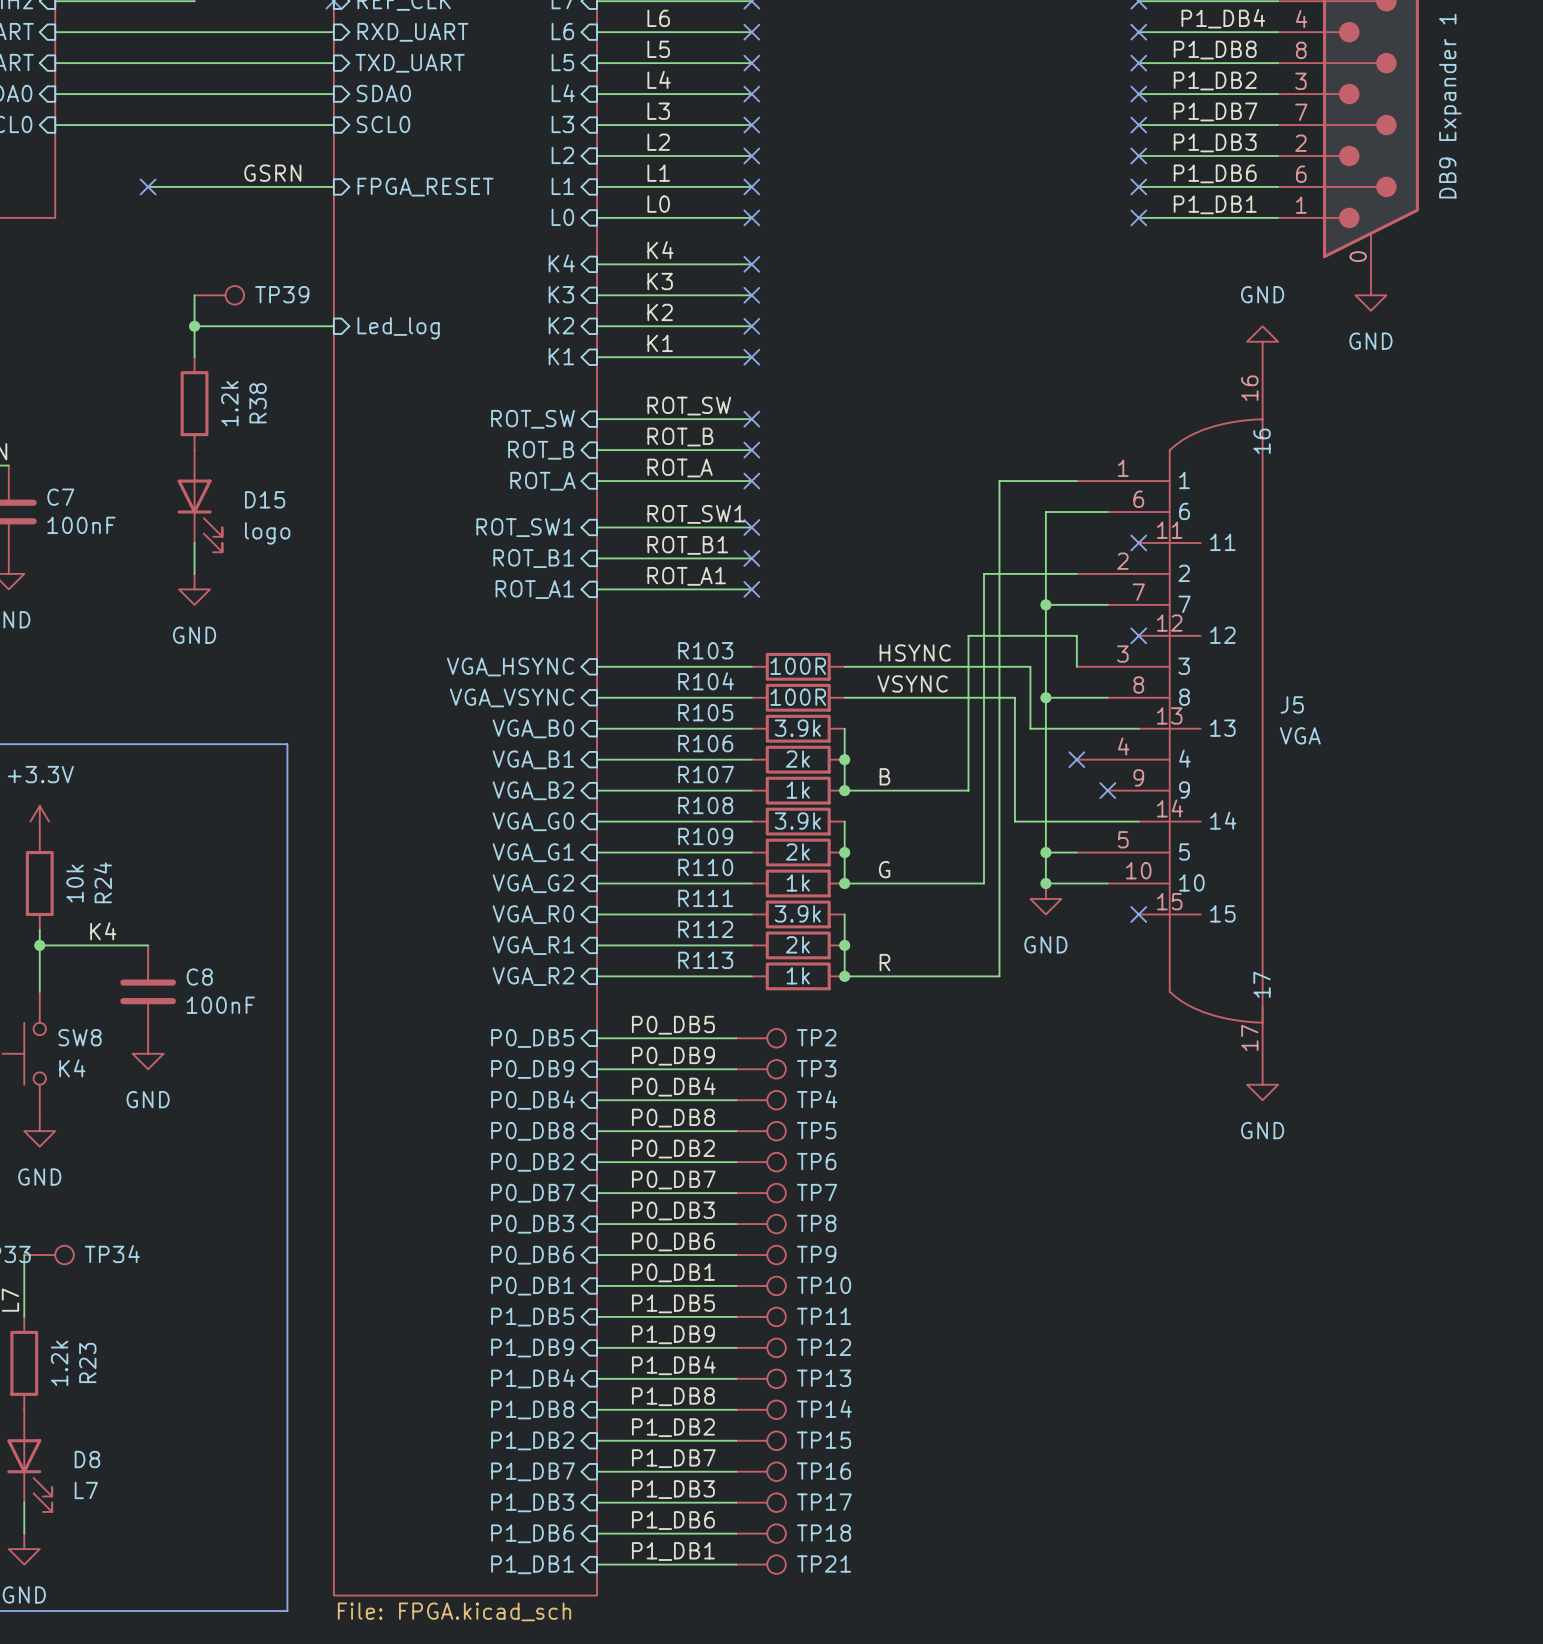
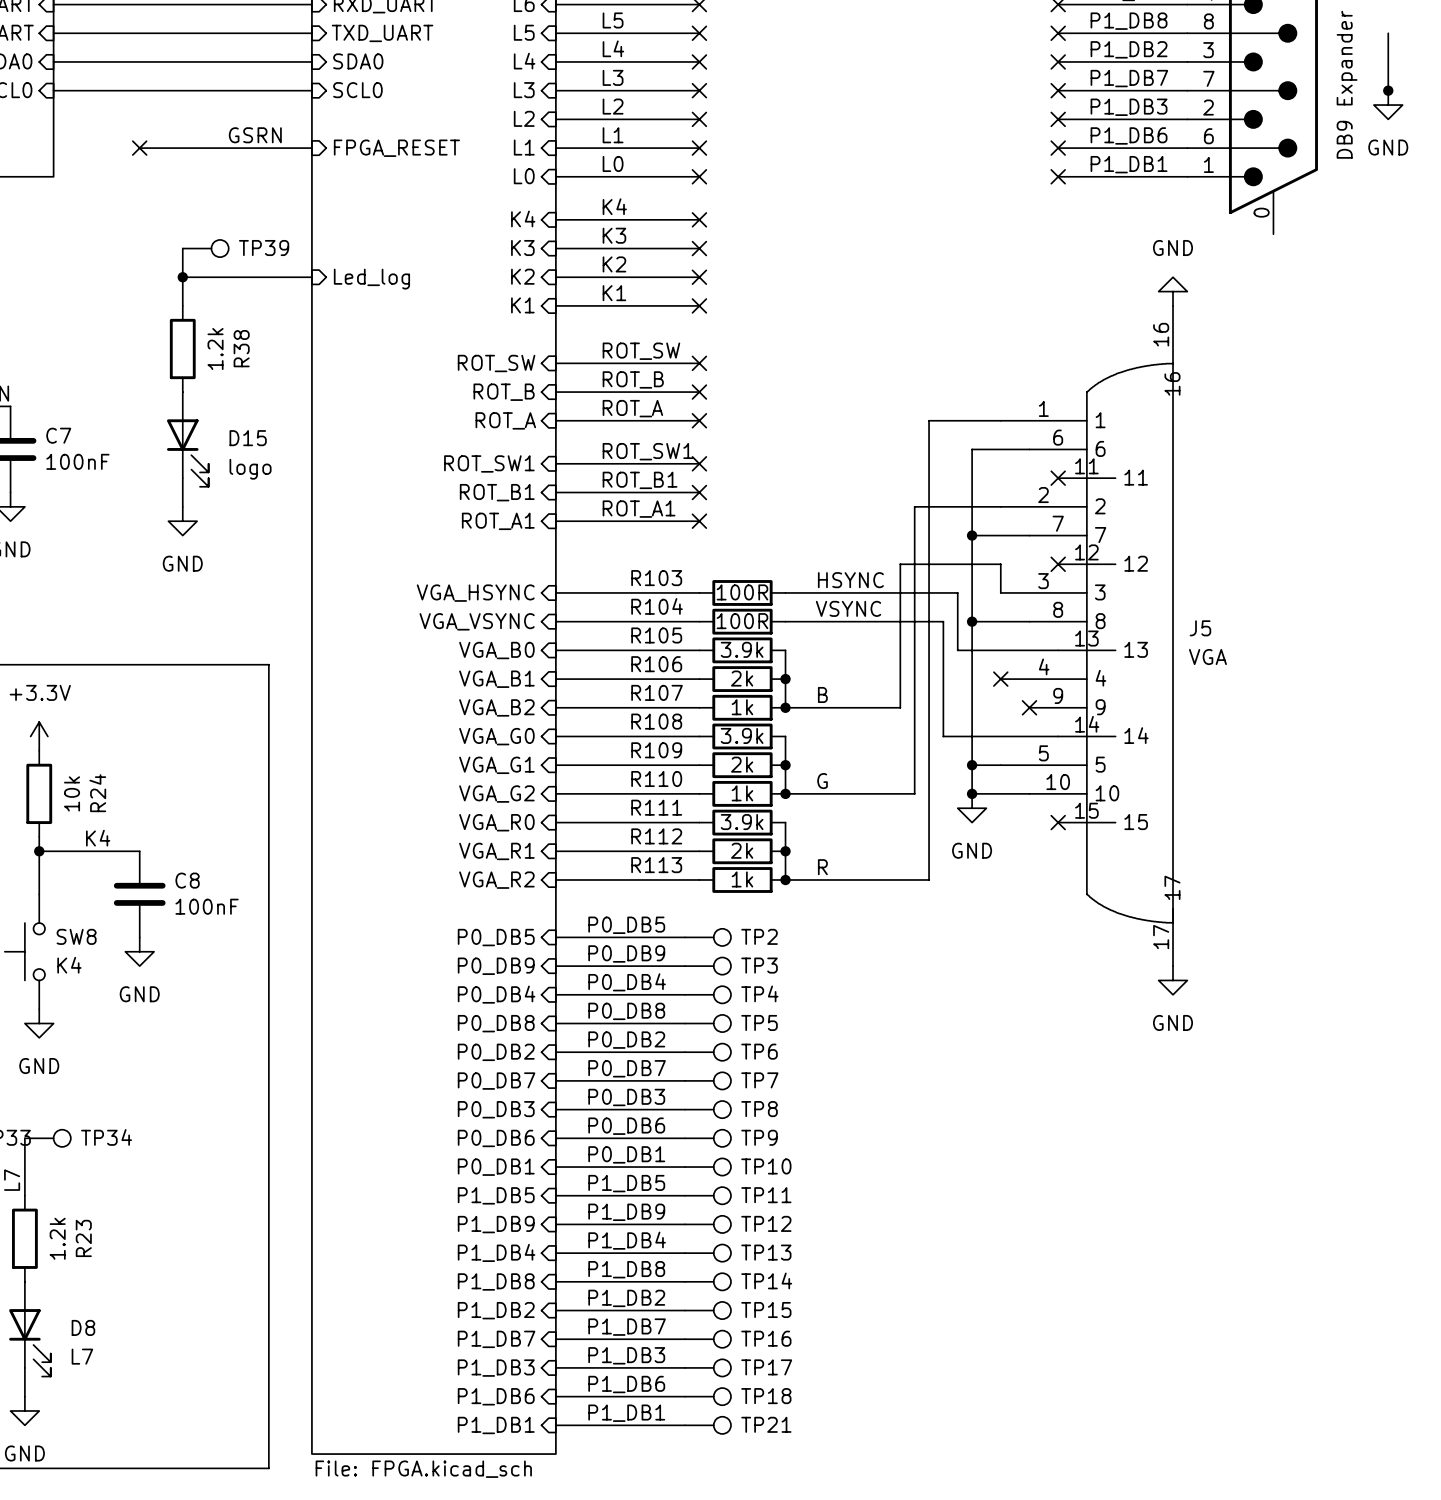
wire: none -> (1388, 33) (1388, 90)
junction: none -> (1388, 90)
power symbol: none -> GND (1388, 105)
power symbol: GND (1370, 295) -> none

